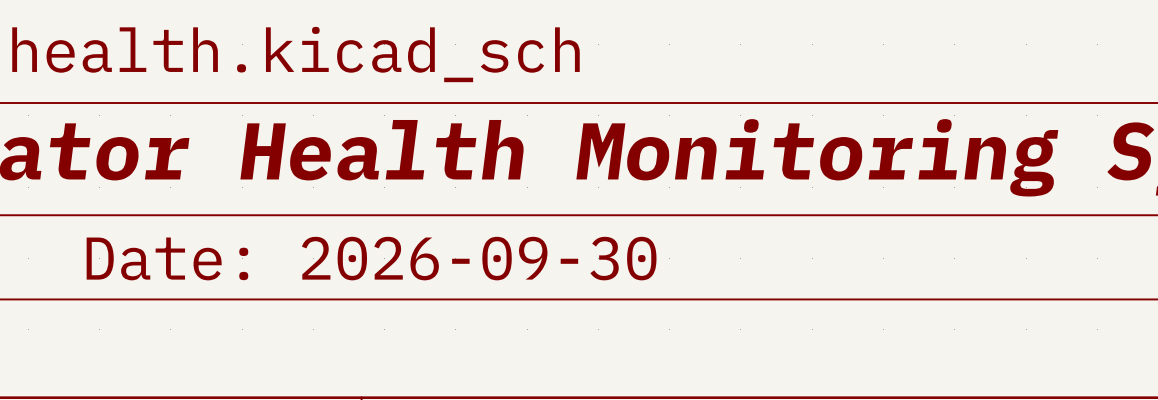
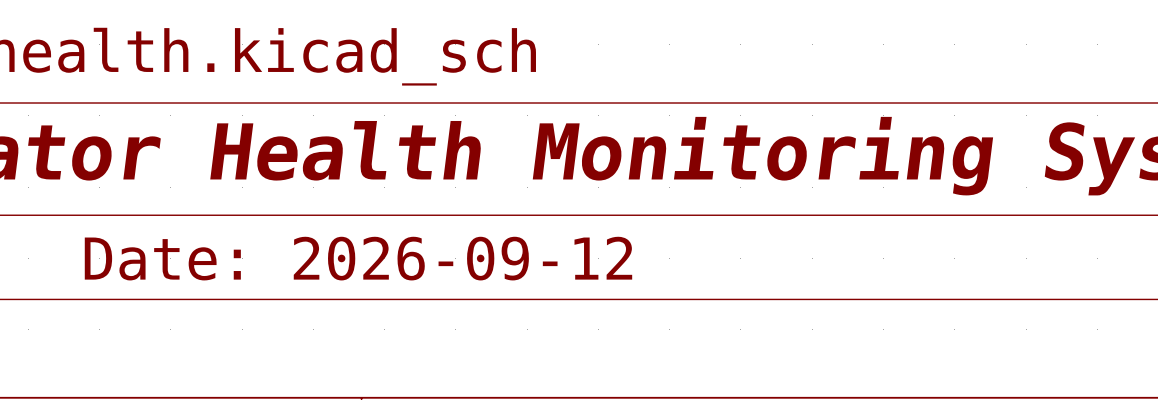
title block: Date: 2026-09-30 (371, 258) -> Date: 2026-09-12 (358, 258)

